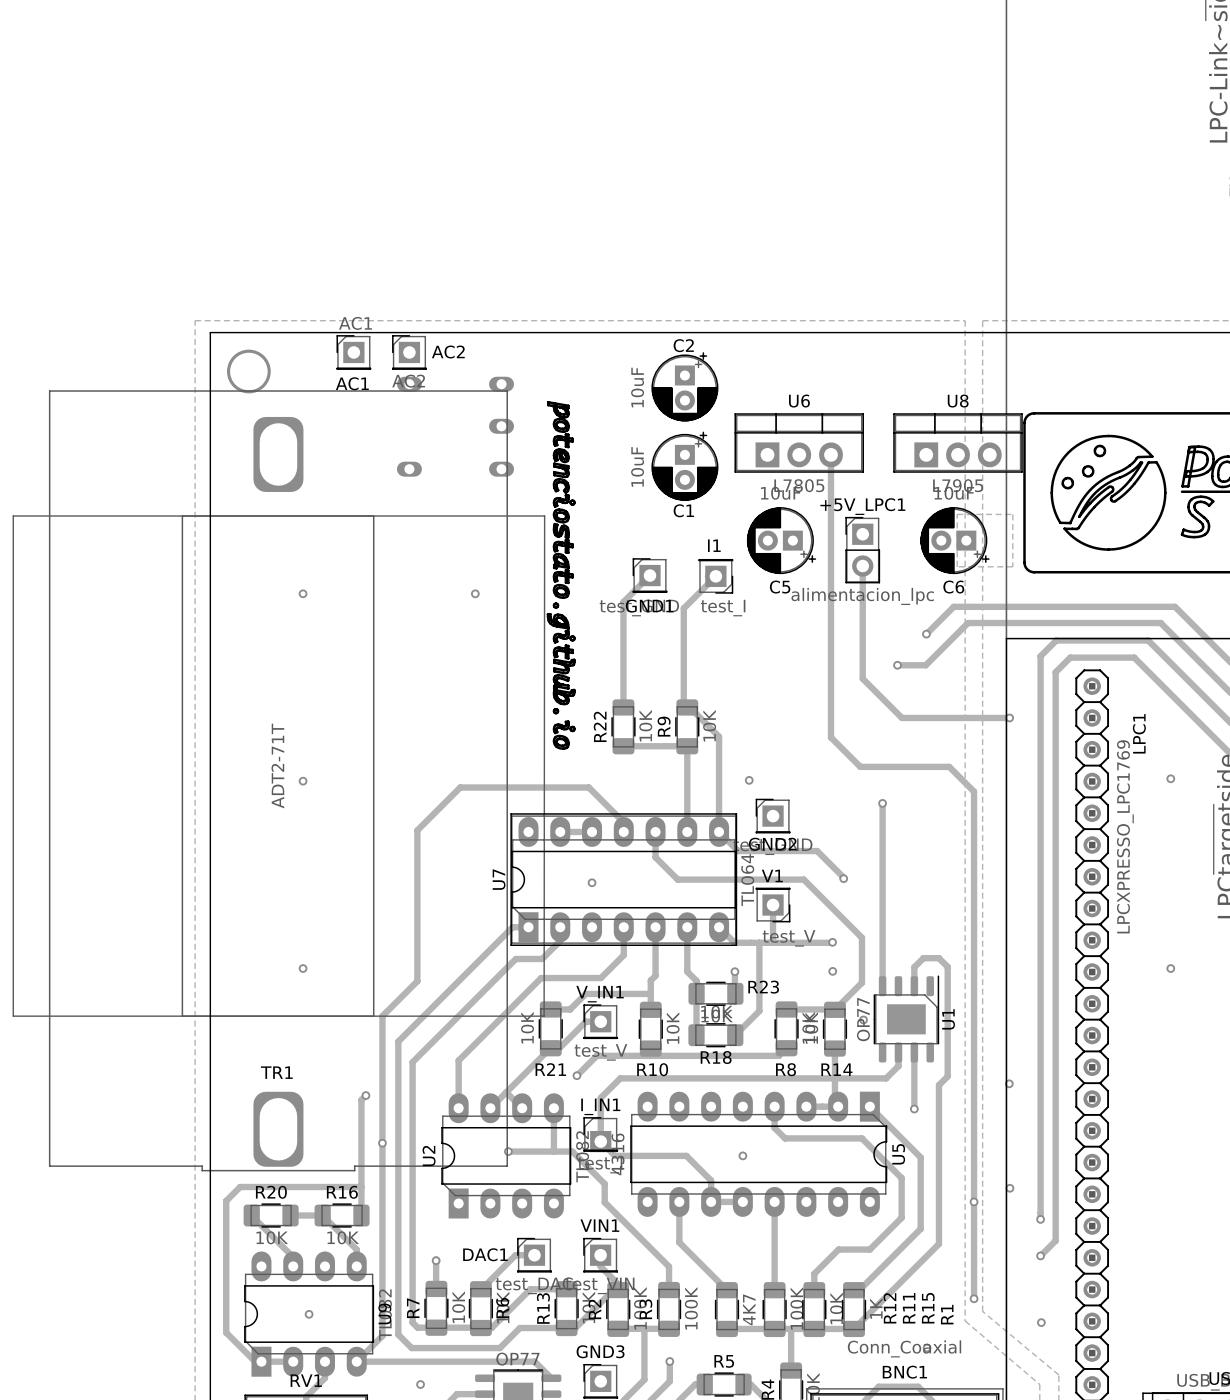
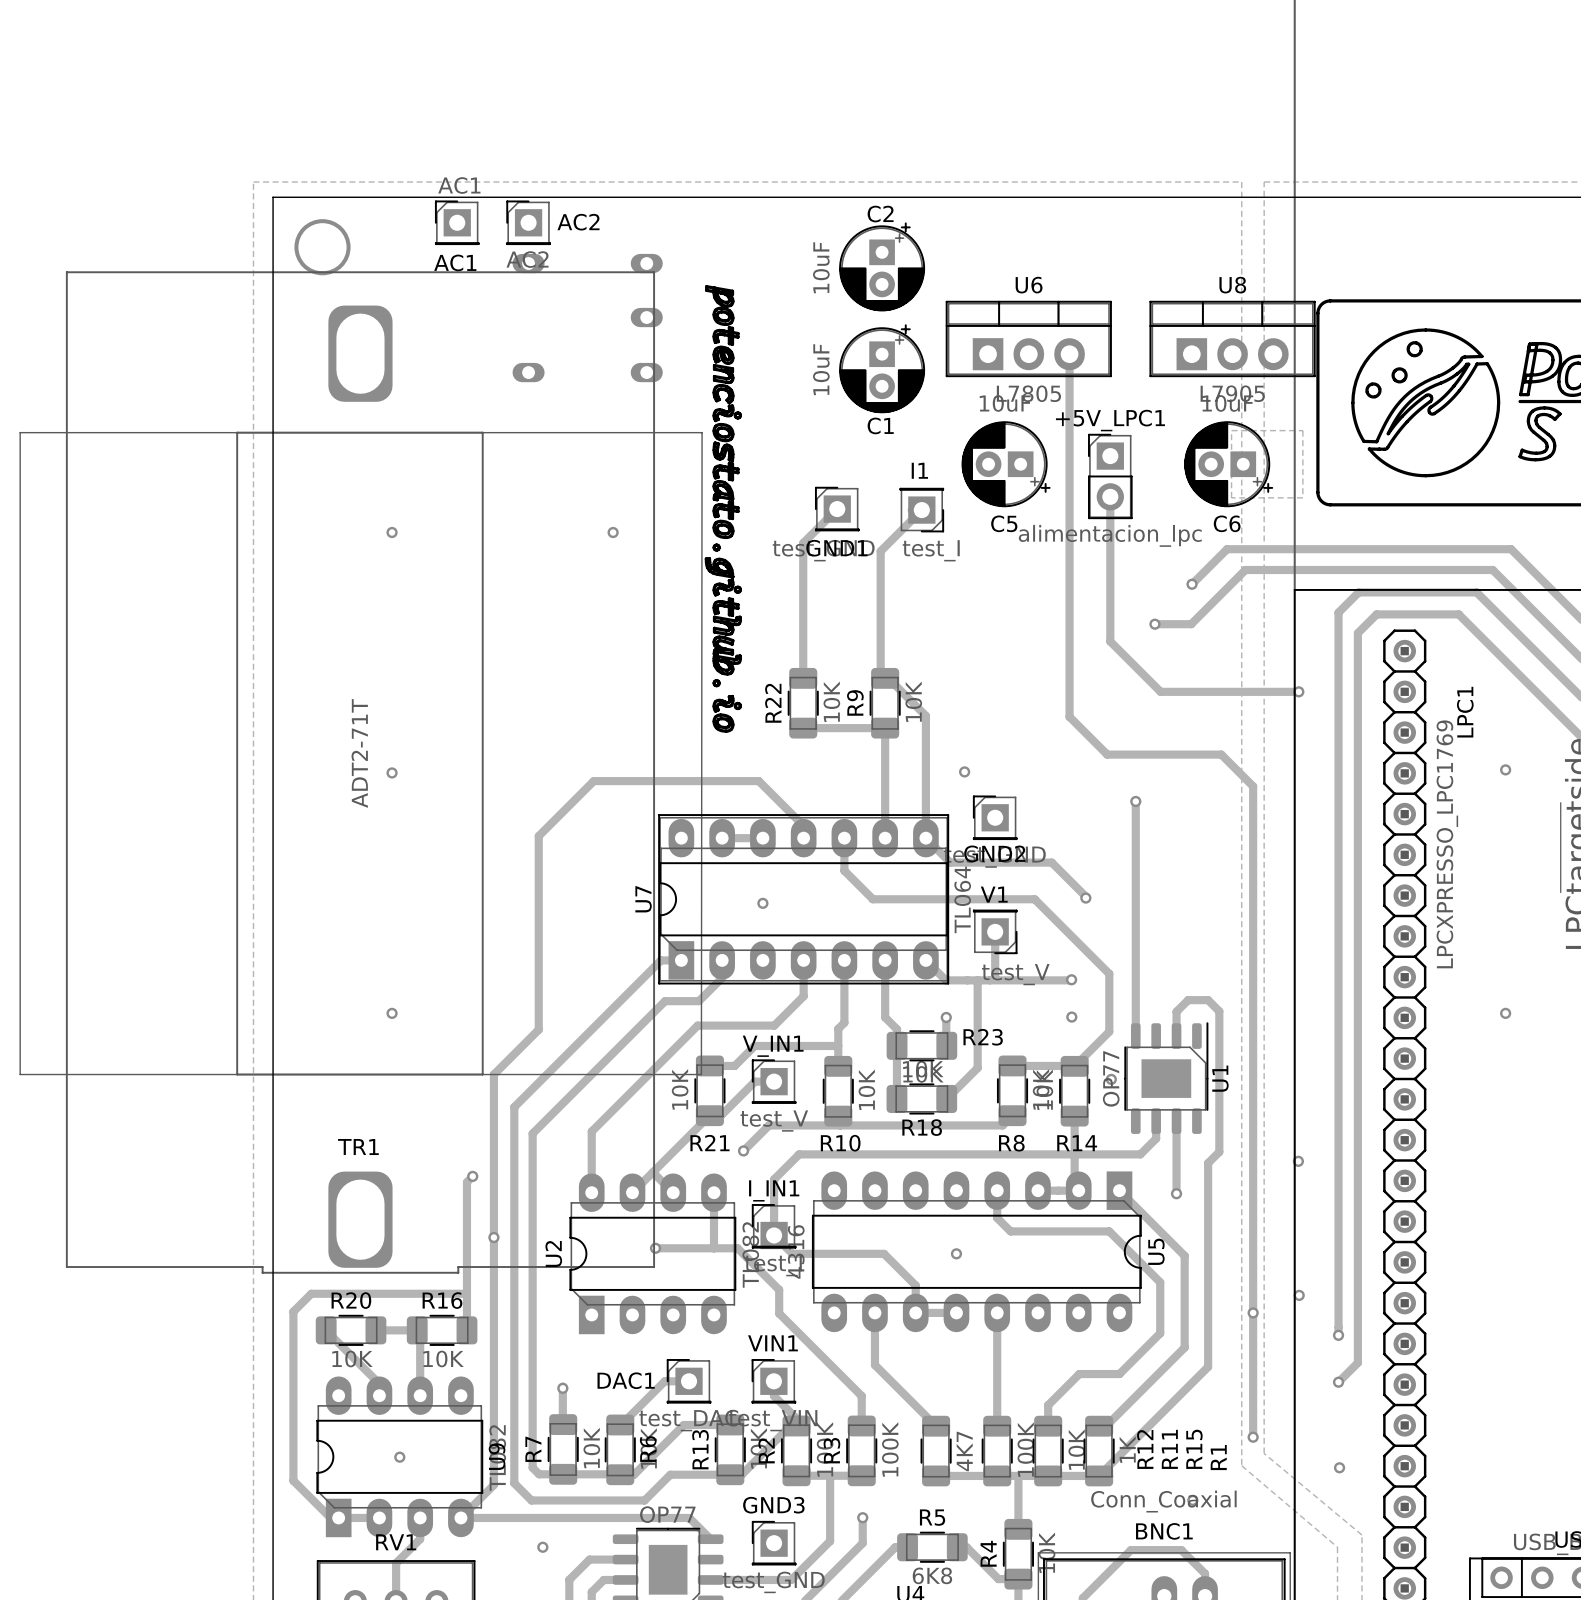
track: (324, 1217) (356, 1249) (356, 1266) -> (420, 1333) (420, 1395)

